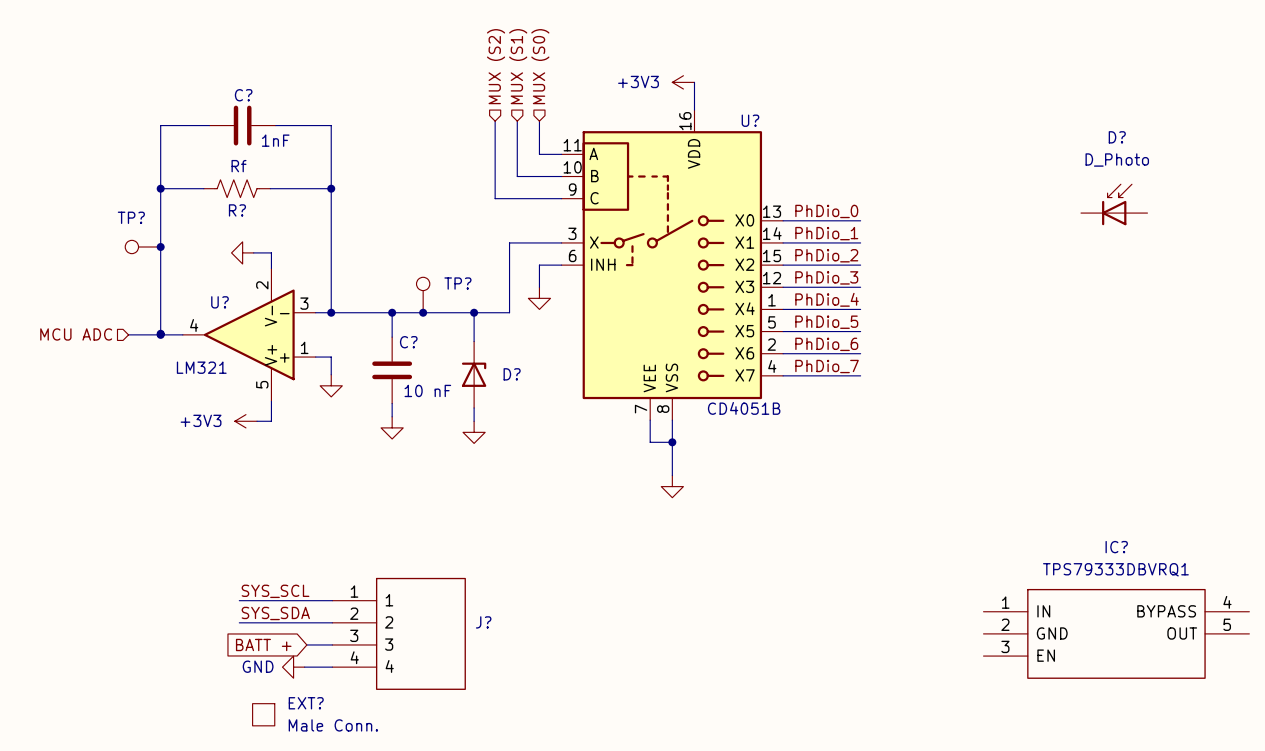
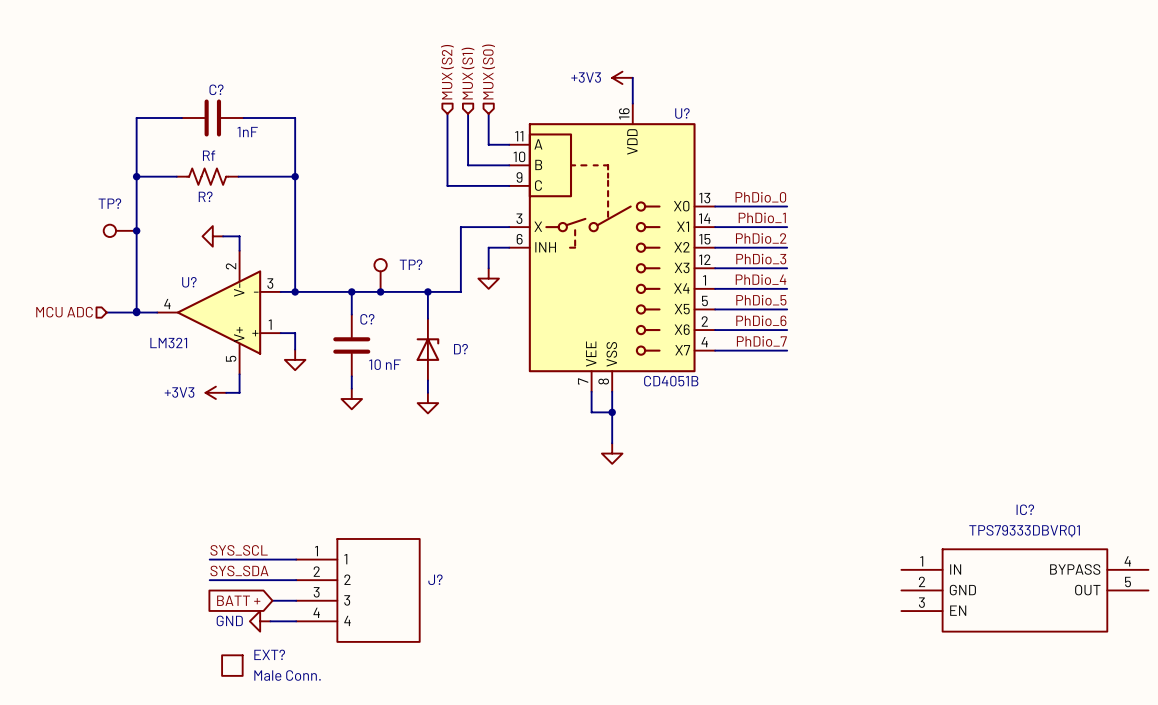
D?: D_Photo (1114, 204) -> none

